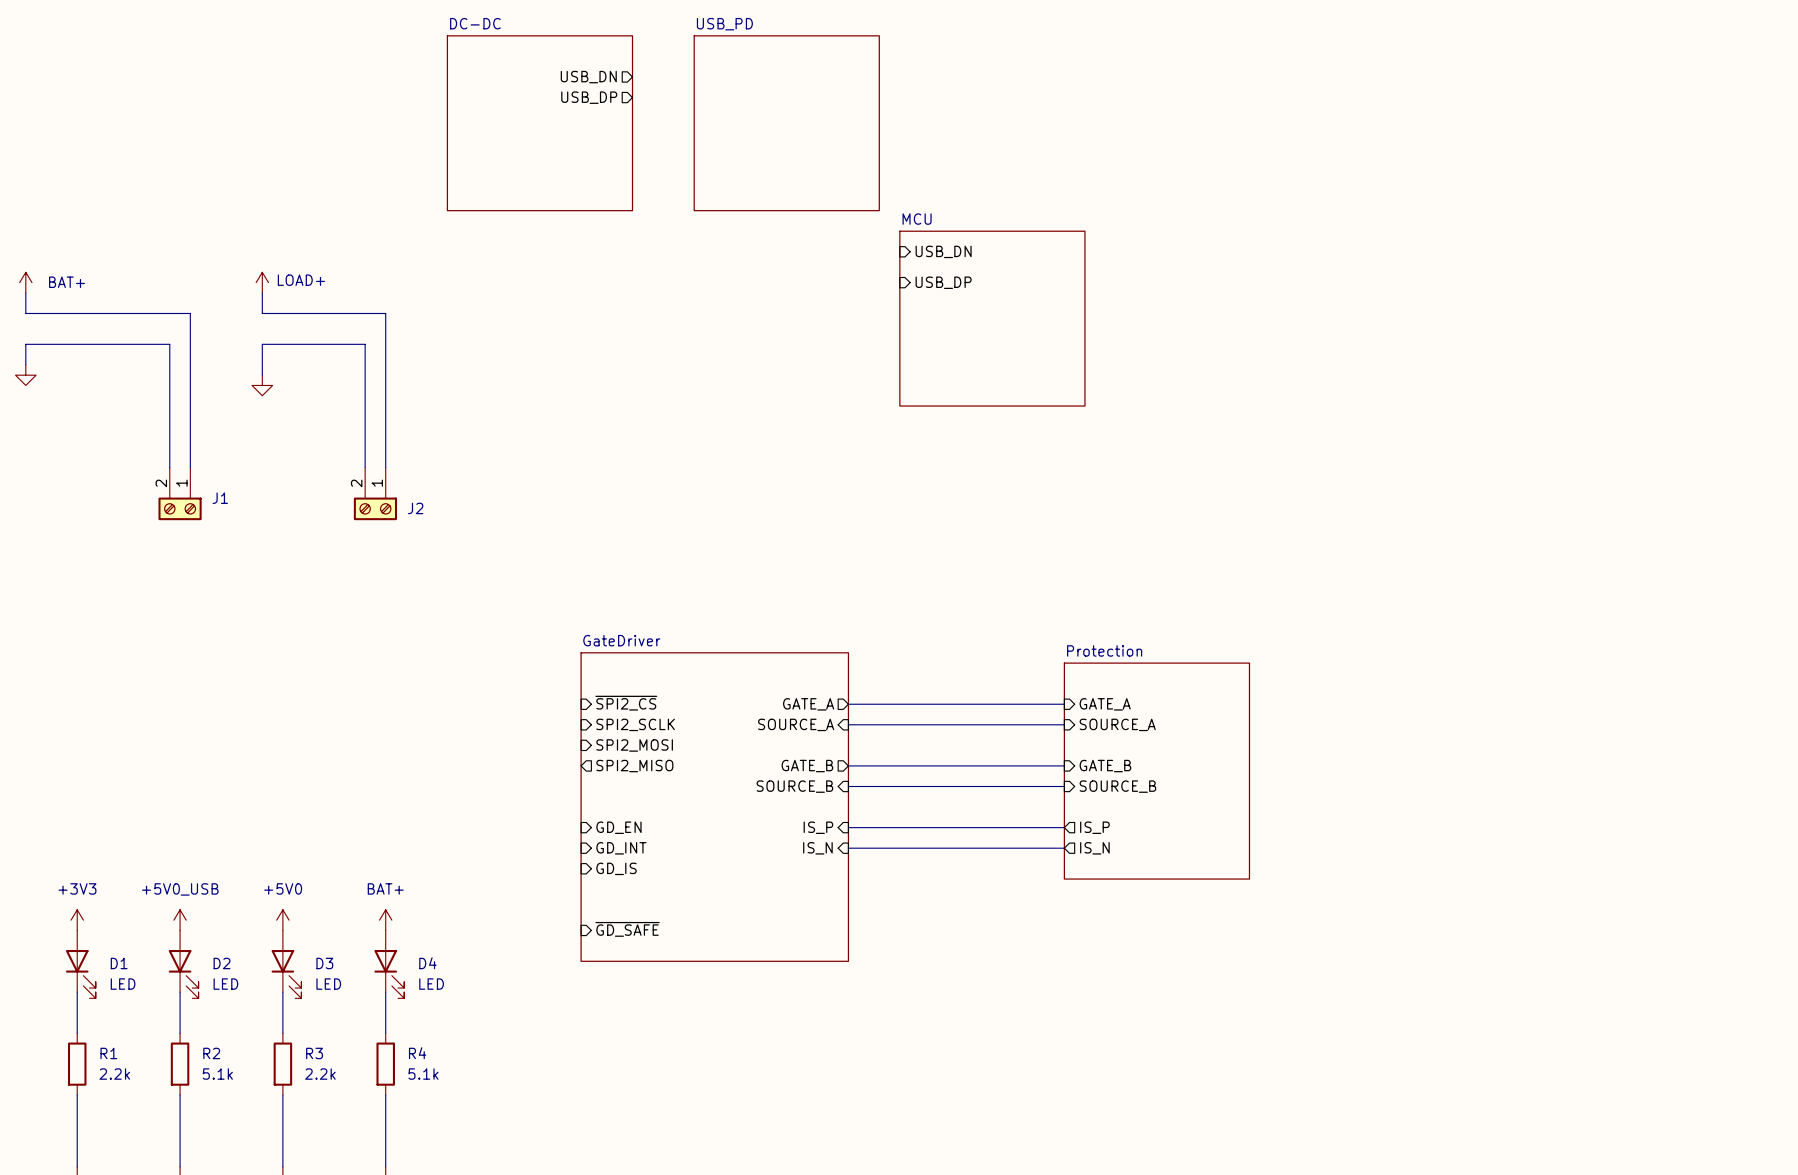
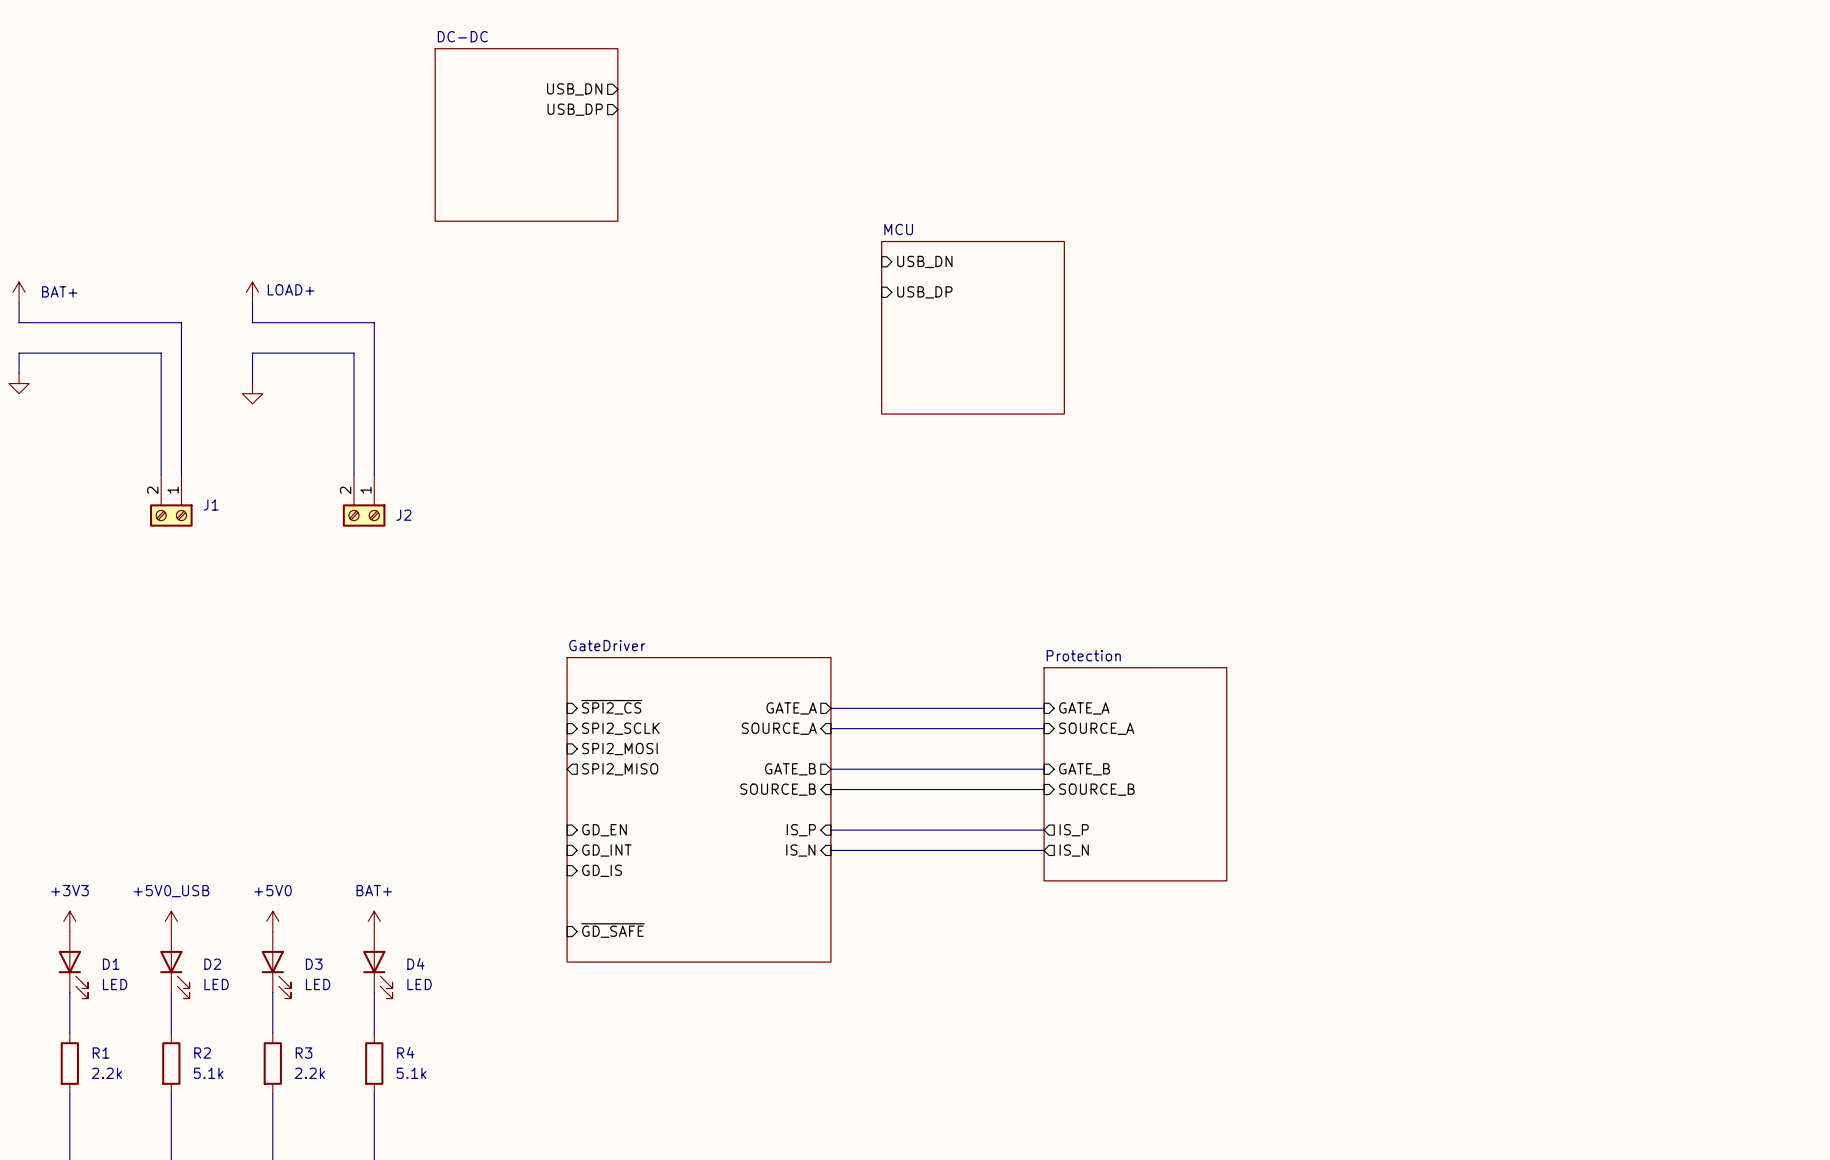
sheet USB_PD: (786, 123) -> none

